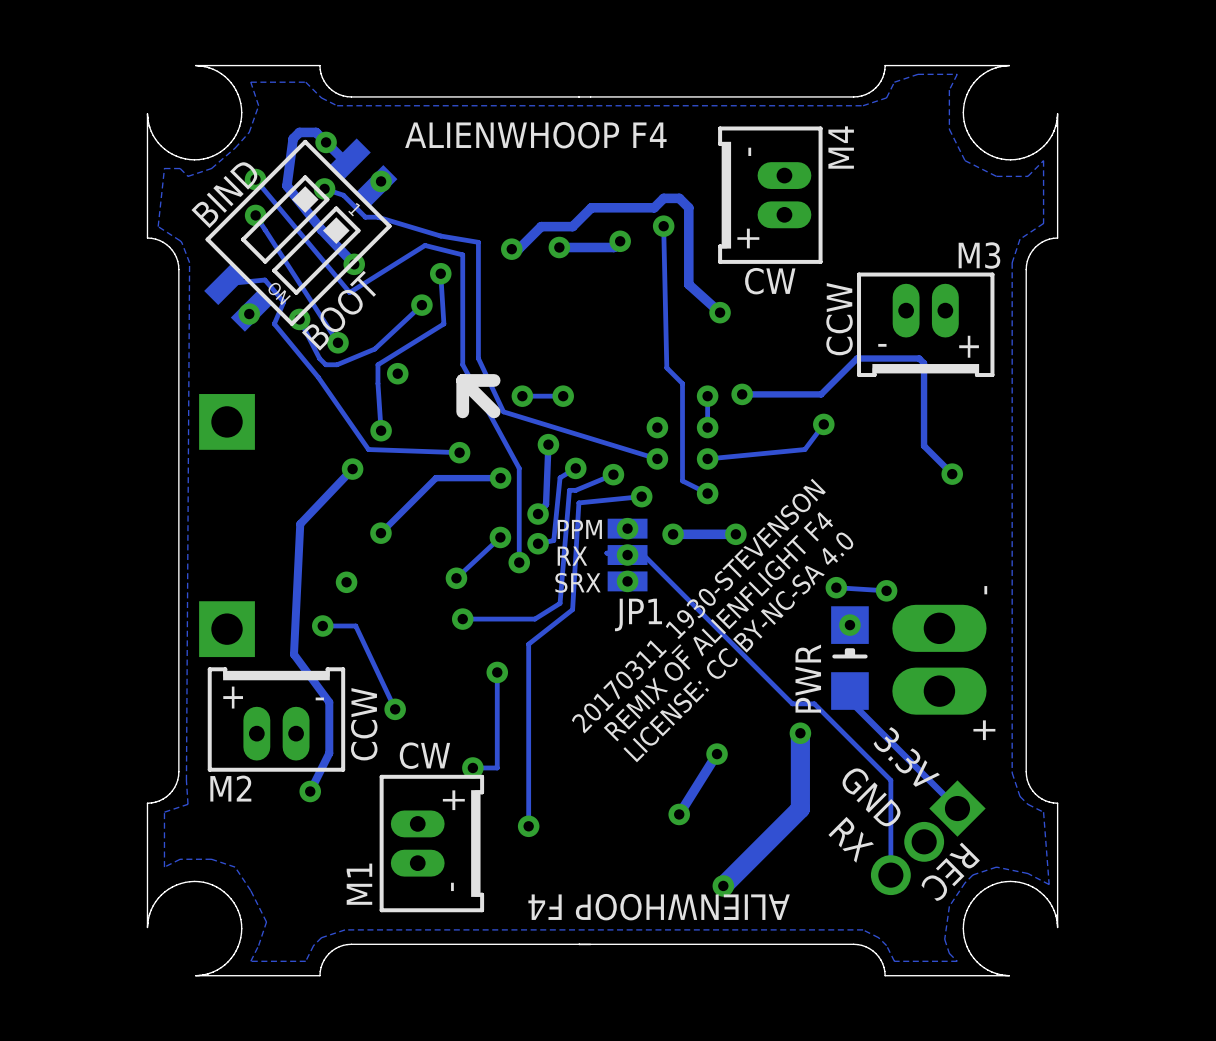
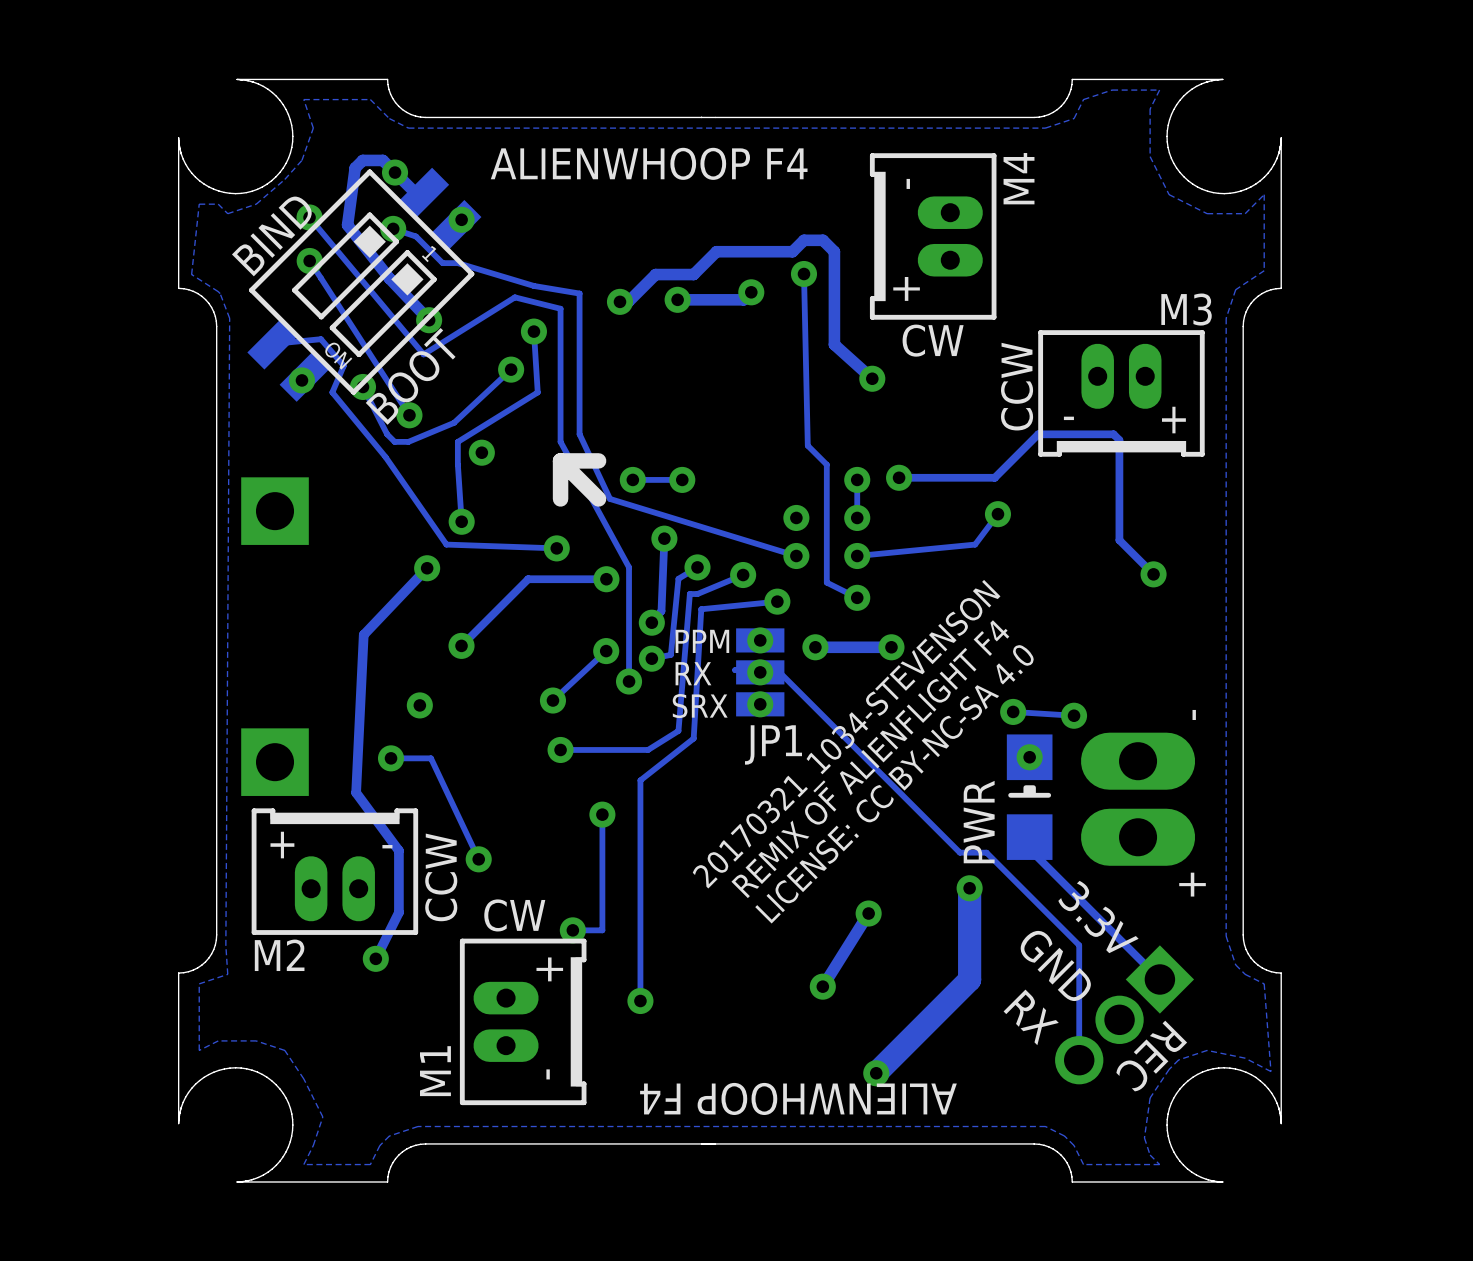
text: 20170311_1930-STEVENSON (698, 606) -> 20170321_1034-STEVENSON (846, 734)

